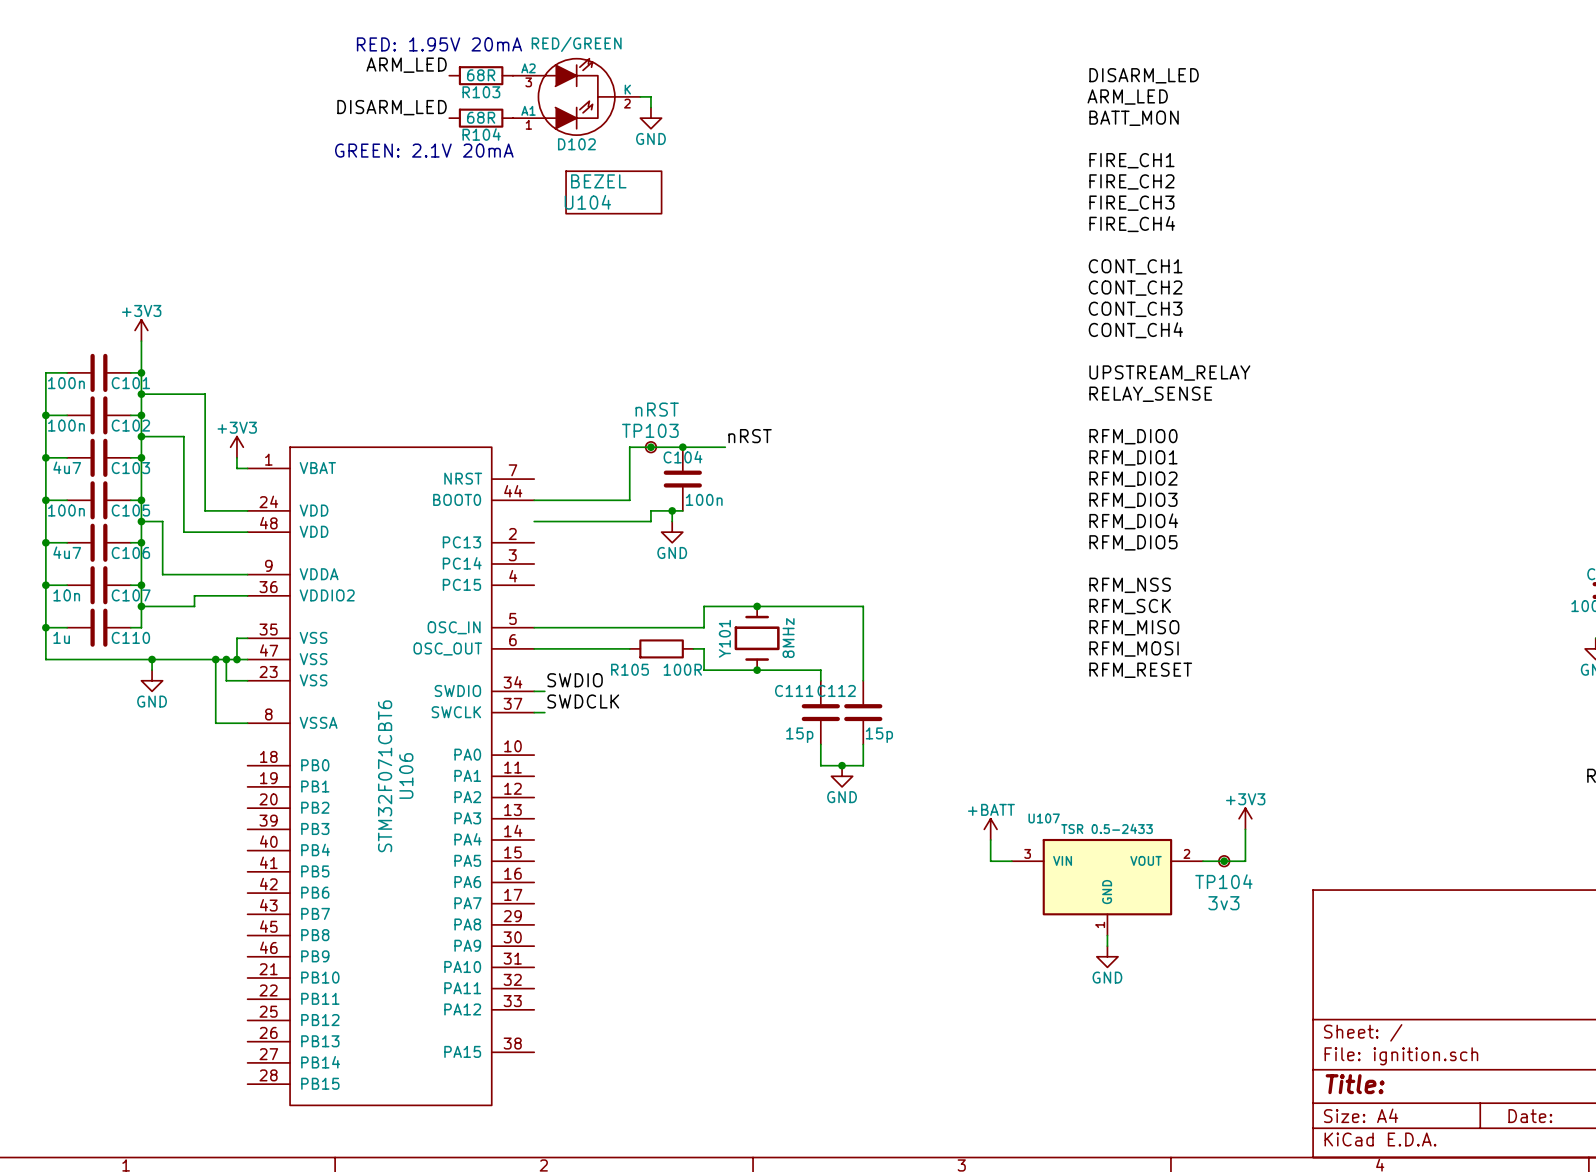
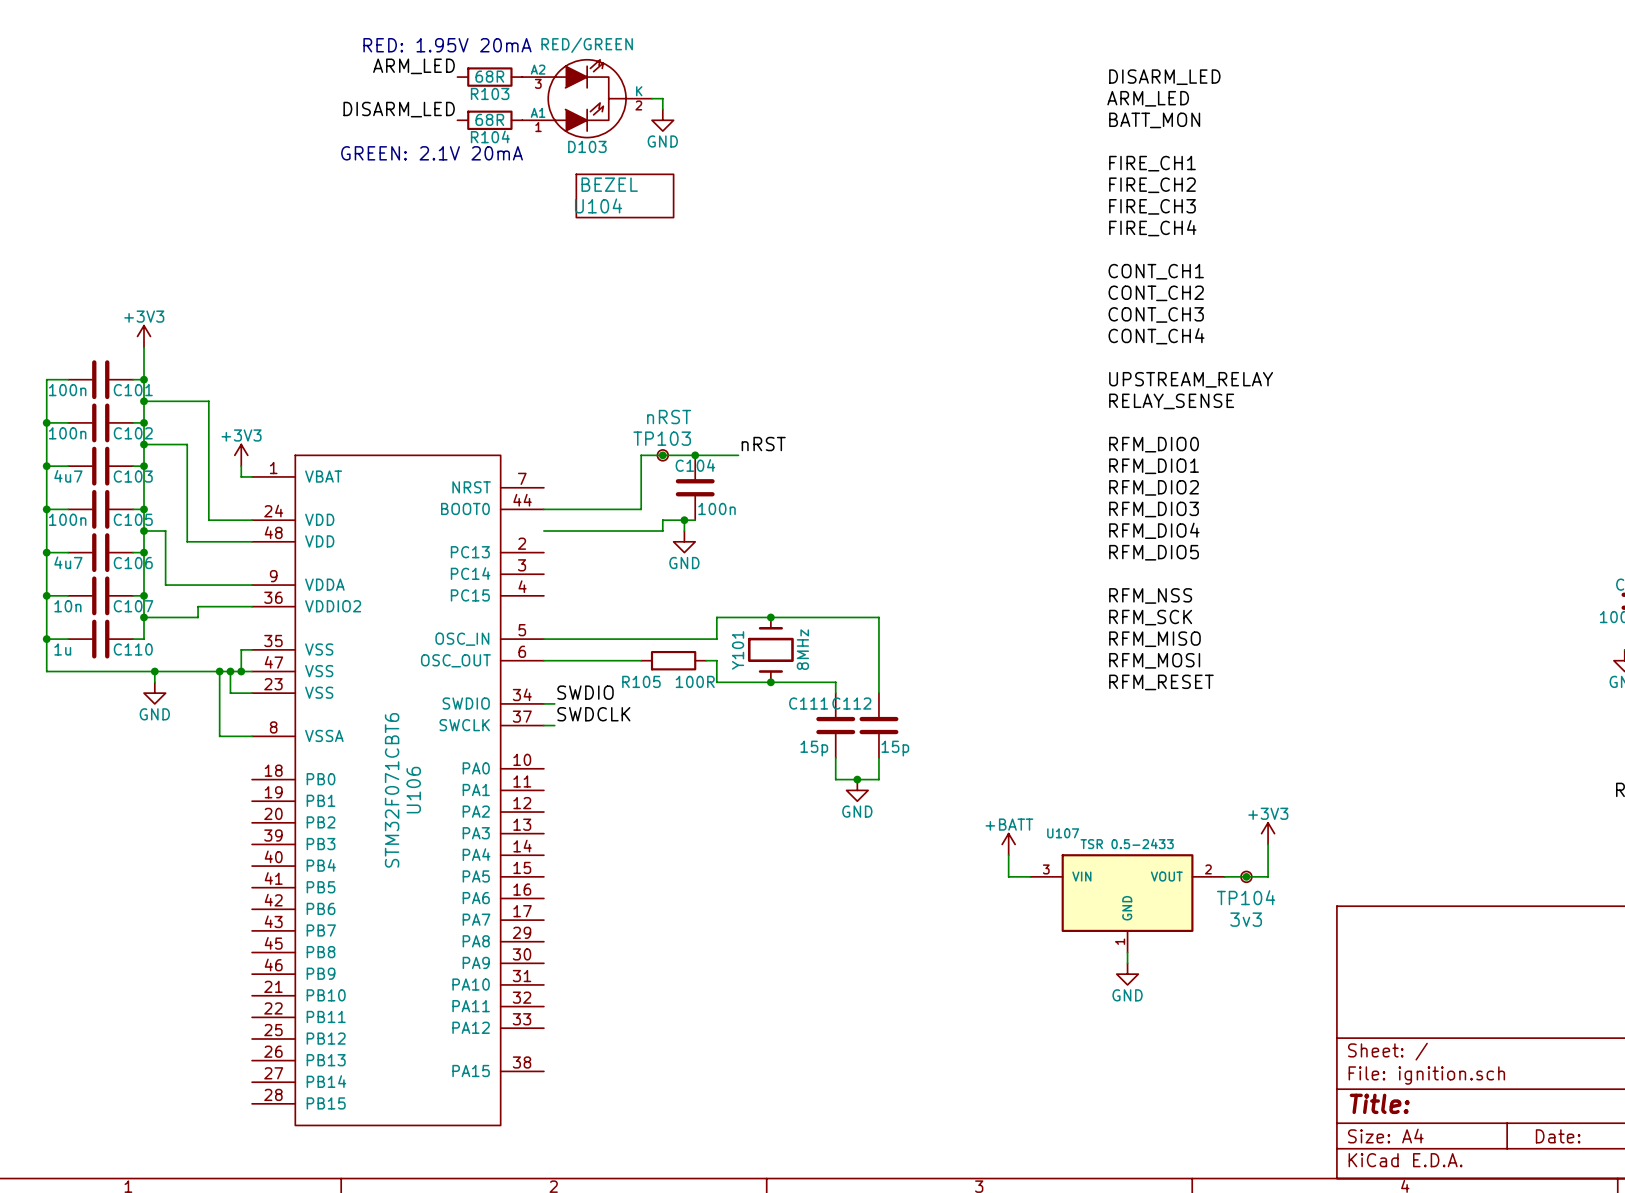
D102 name: D102 (576, 144) -> D103 (587, 146)

